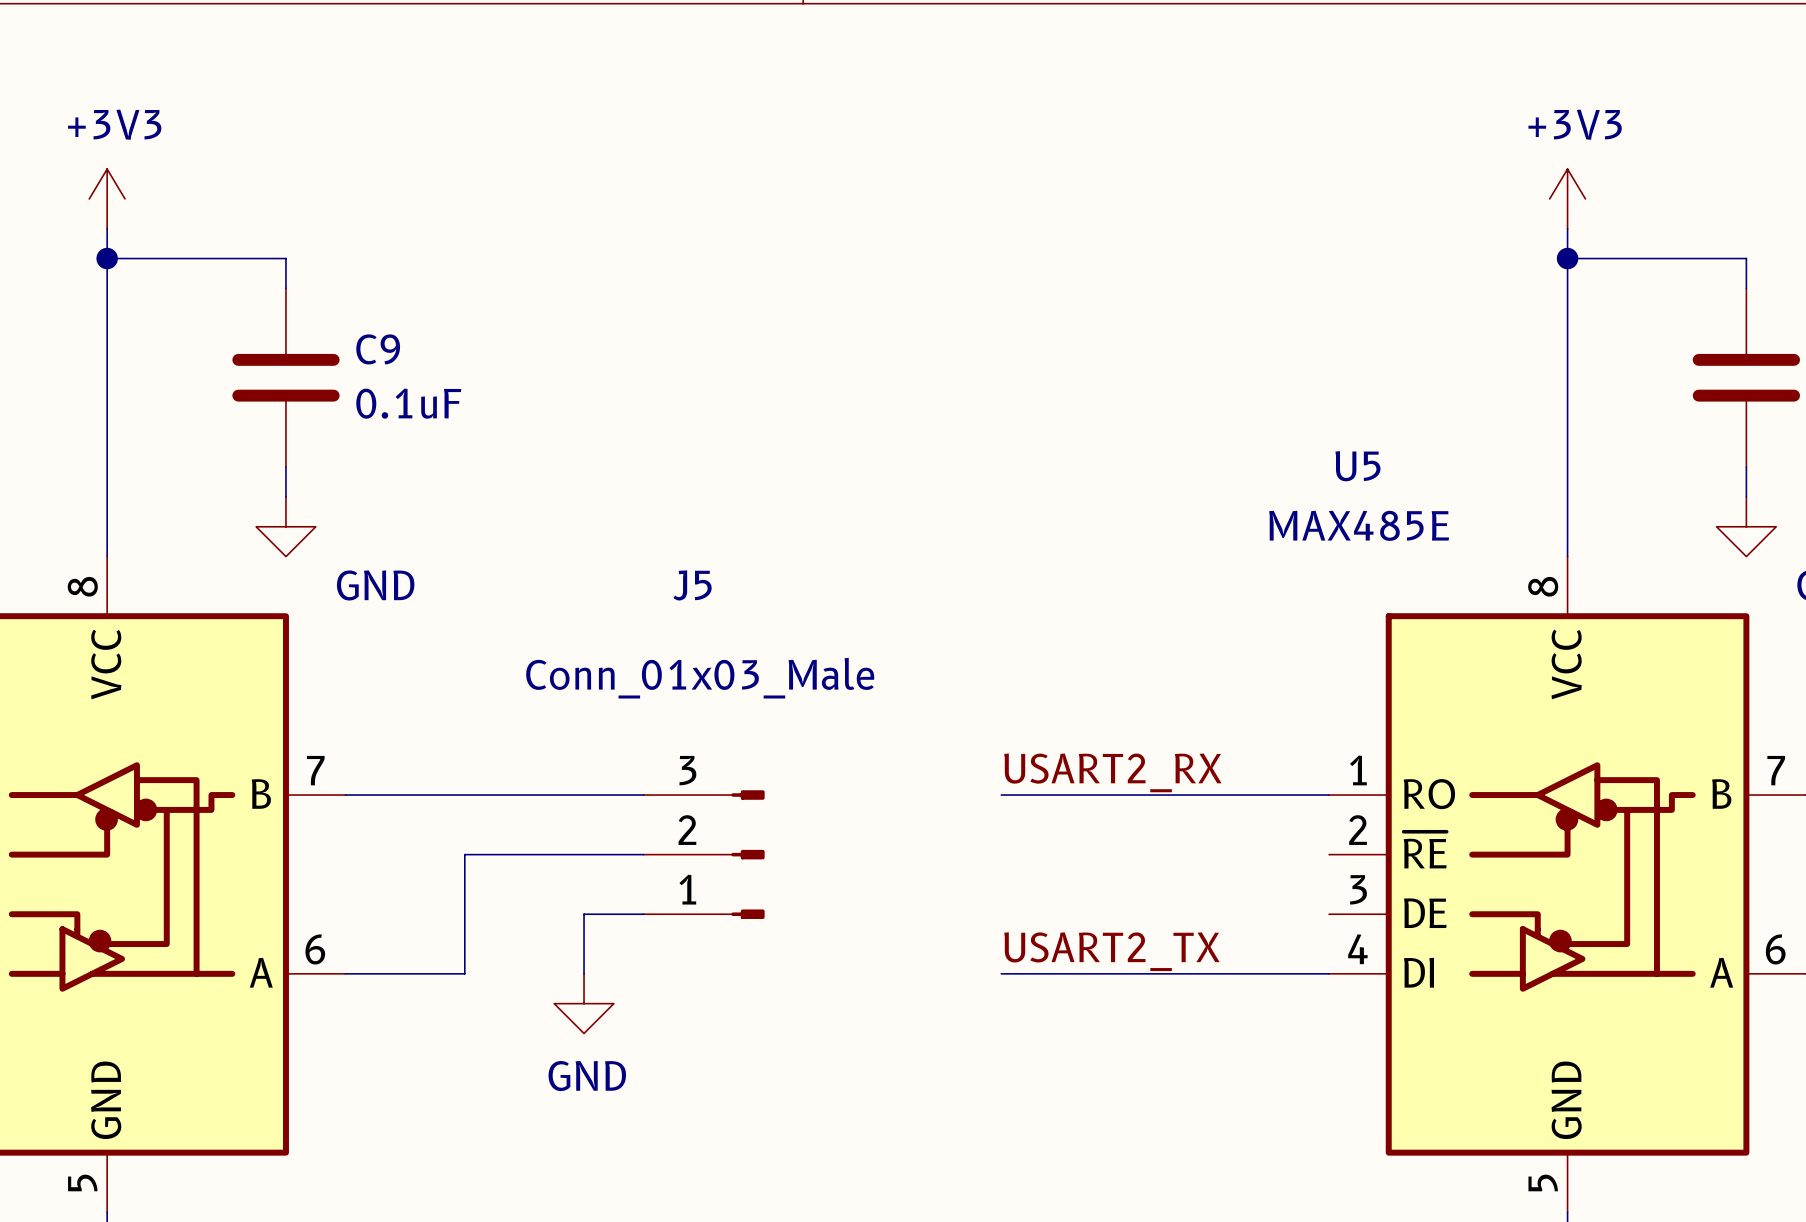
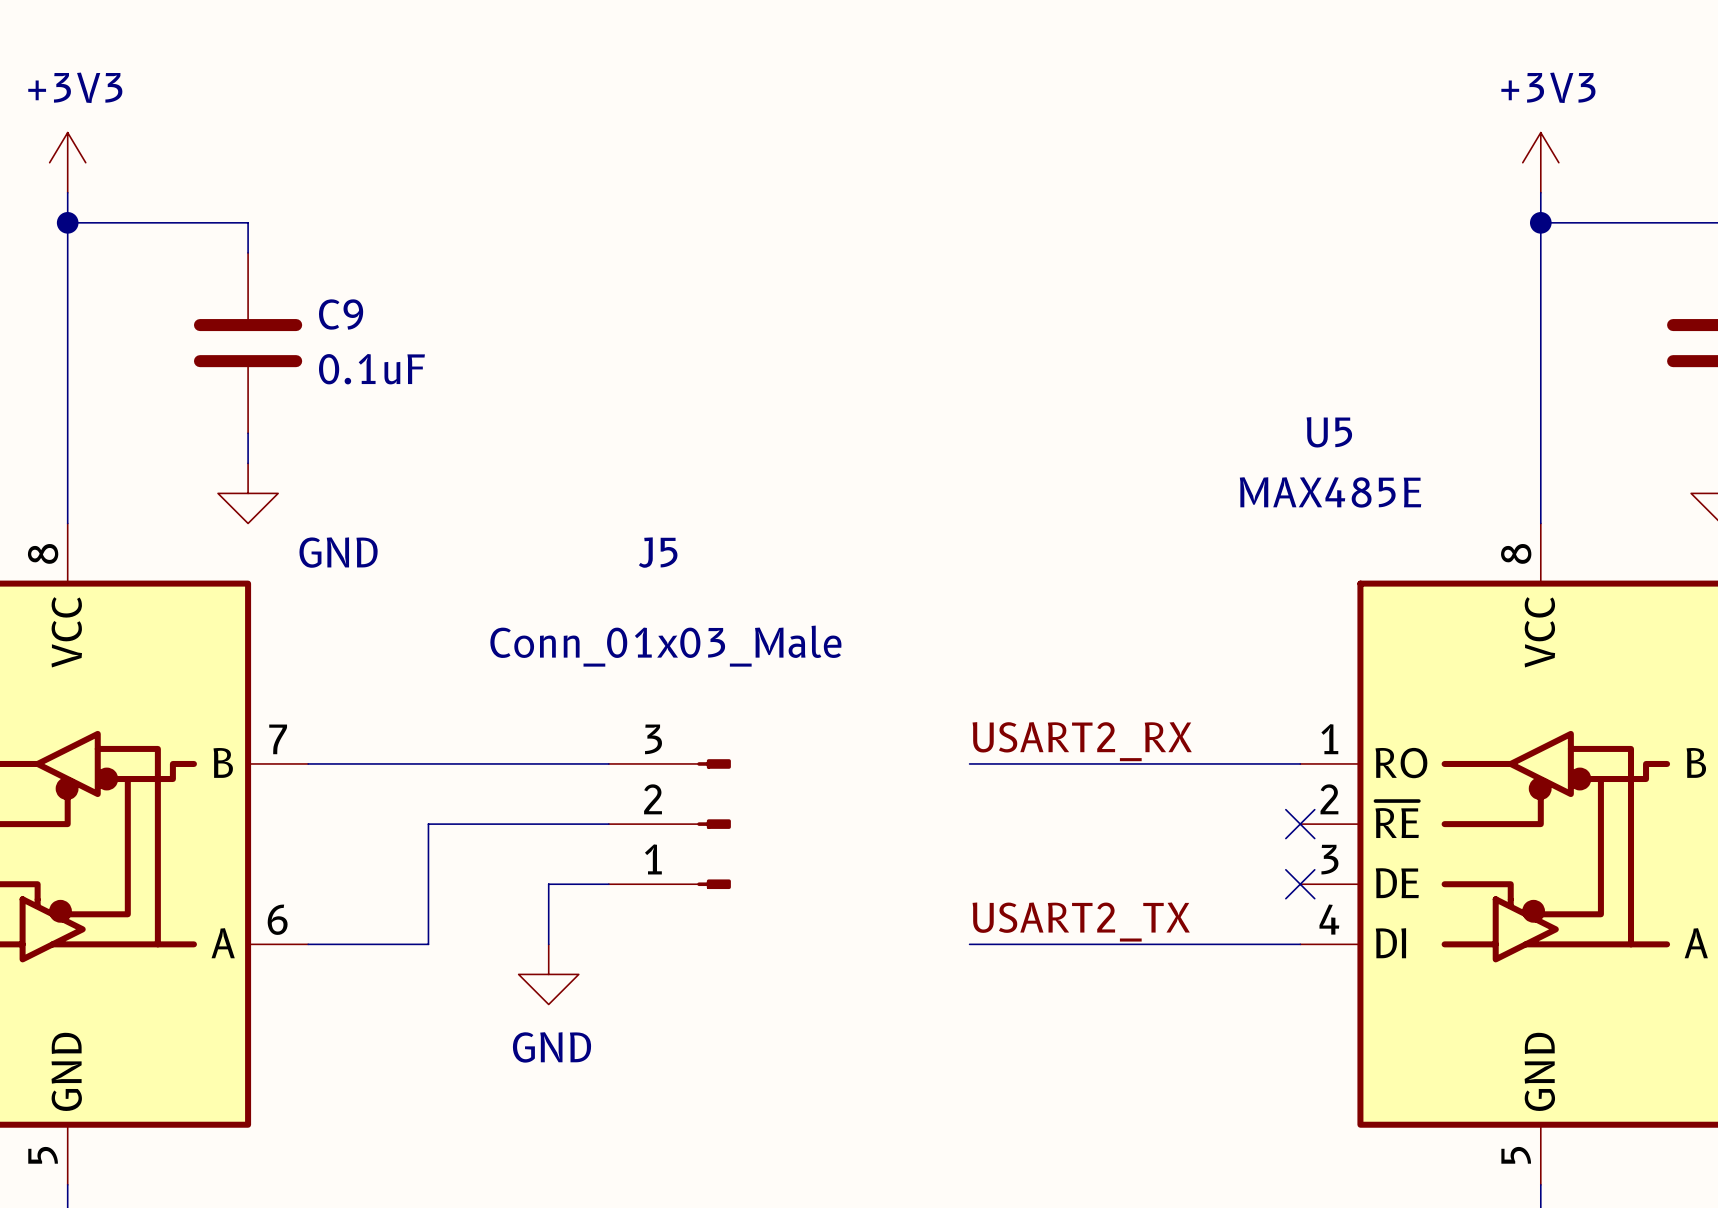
no-connect mark: none -> (1300, 824)
no-connect mark: none -> (1300, 884)

